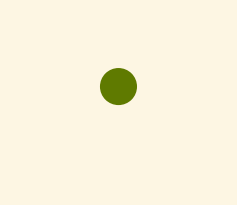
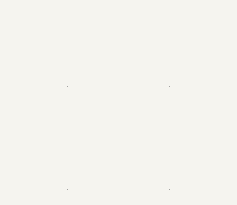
junction: (118, 86) -> none

